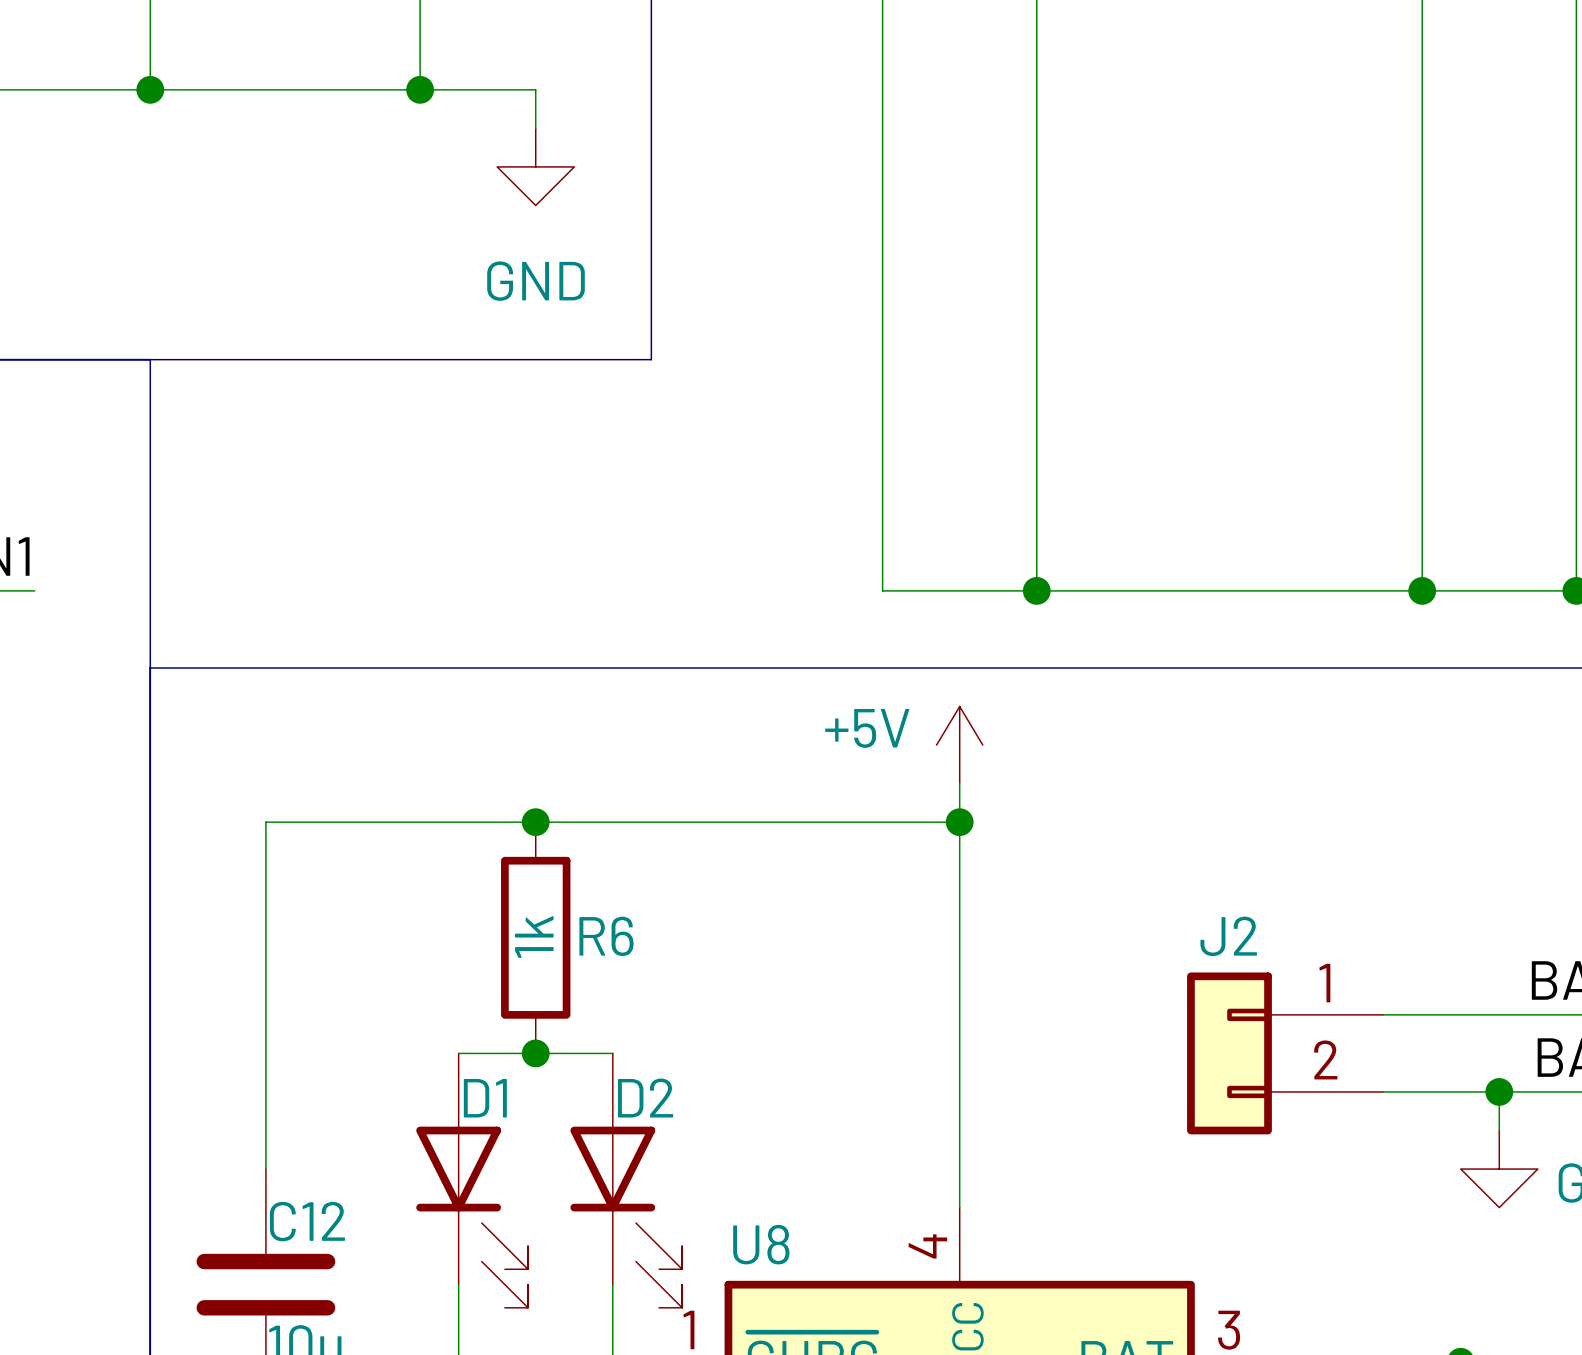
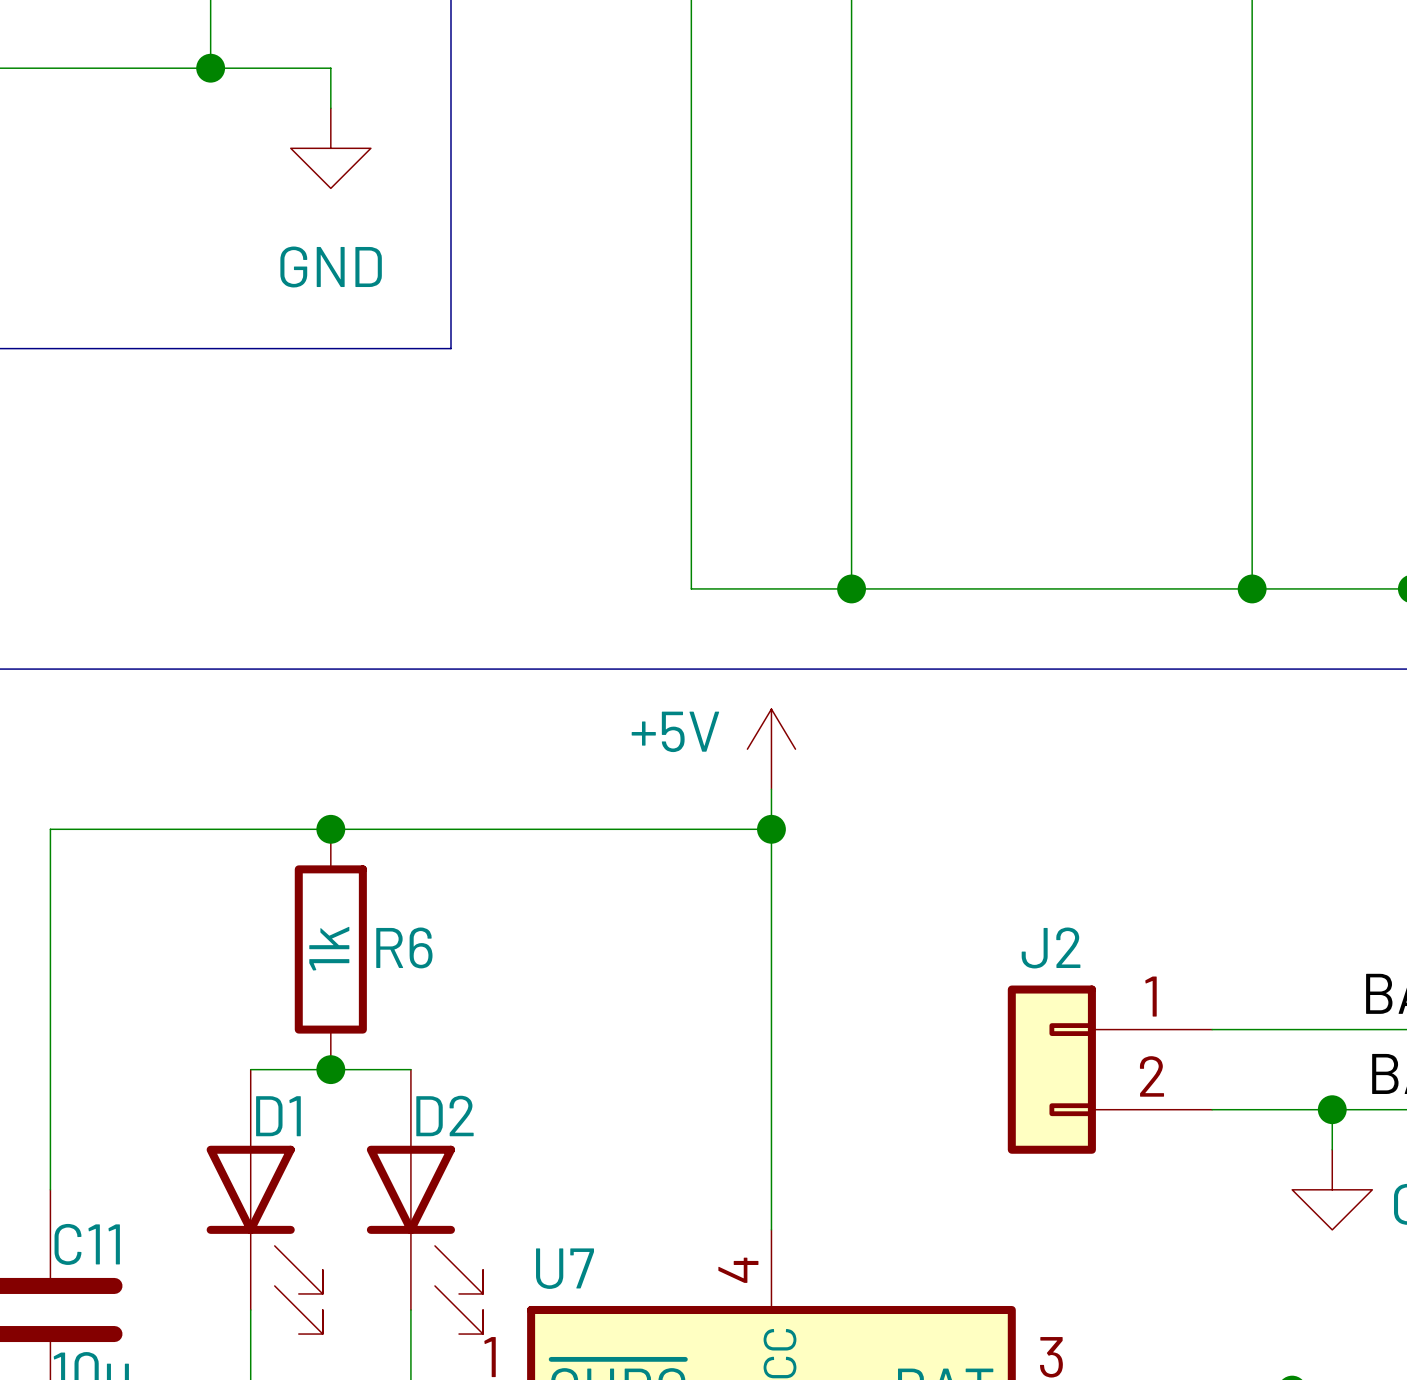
C12 name: C12 (307, 1221) -> C11 (87, 1244)
U8 name: U8 (761, 1244) -> U7 (565, 1268)

